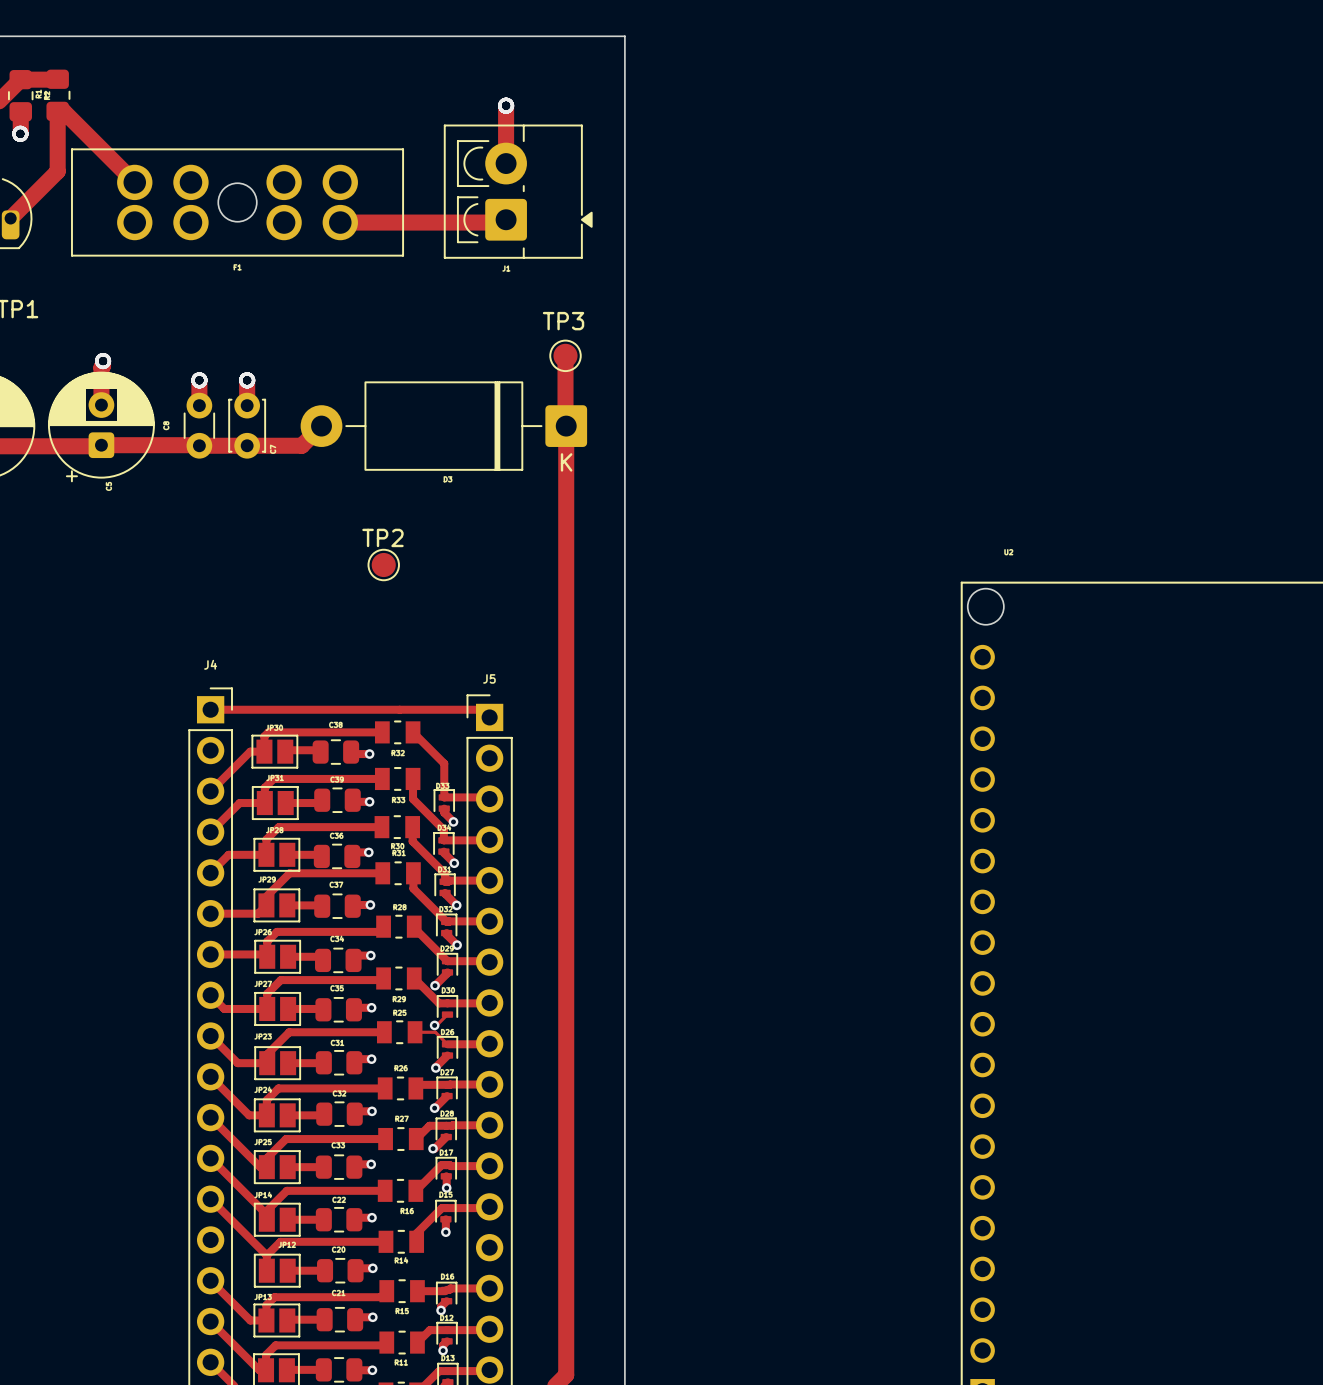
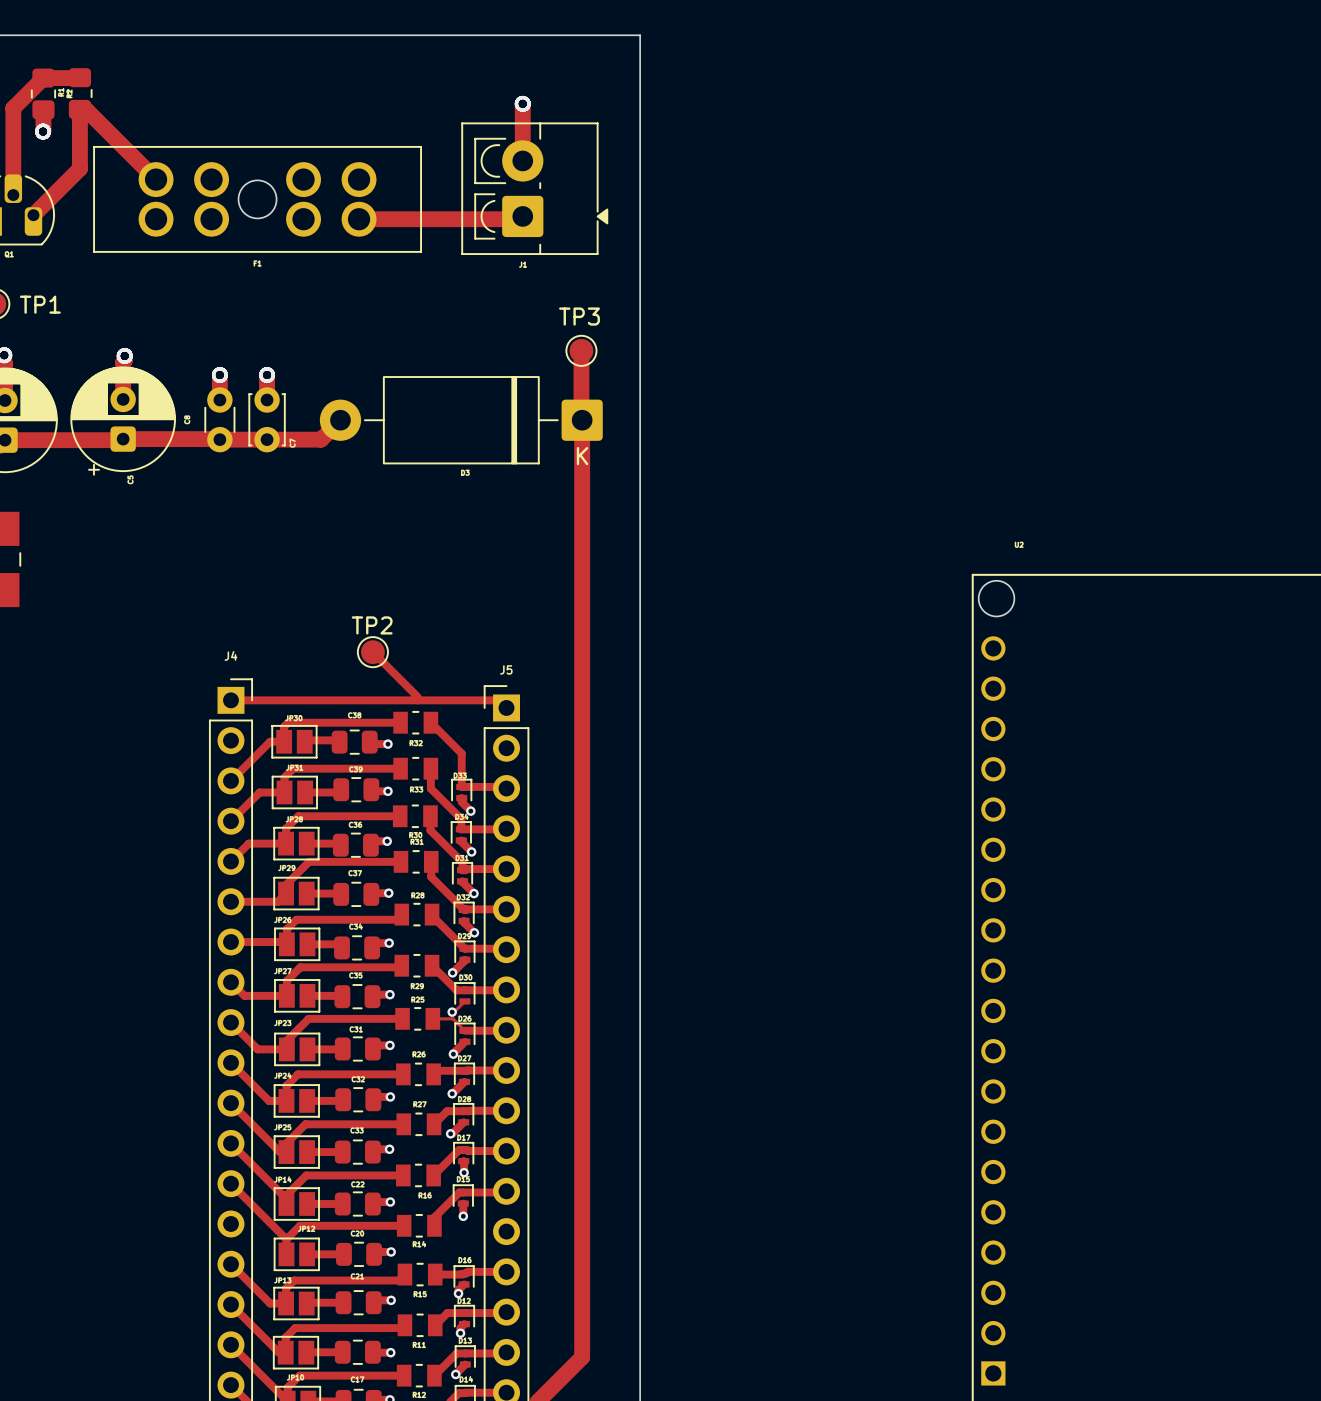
TP2 position: (383, 565) -> (372, 652)
track: none -> (372, 652) (417, 696) (417, 700)

